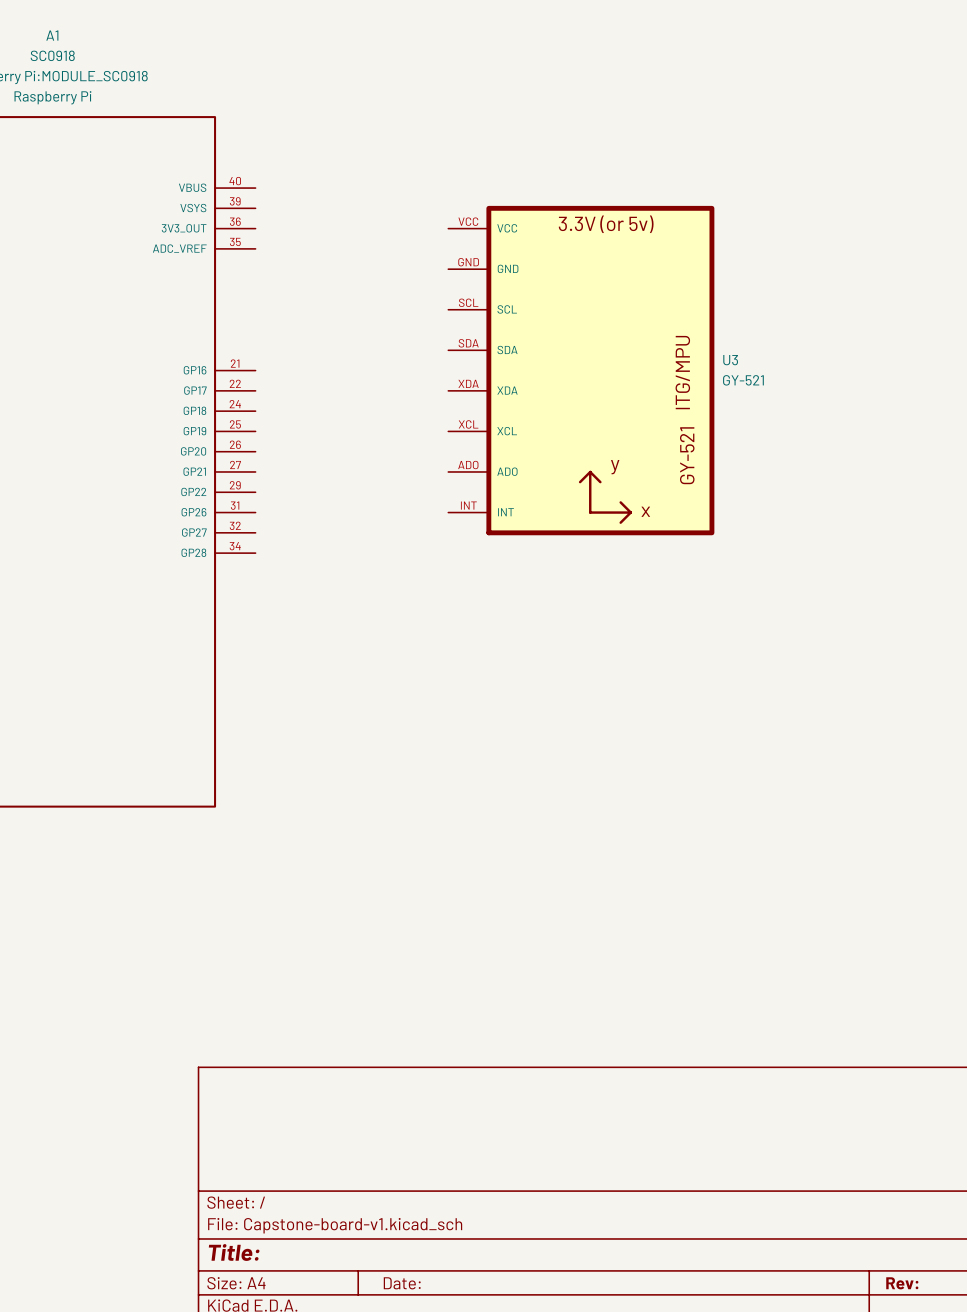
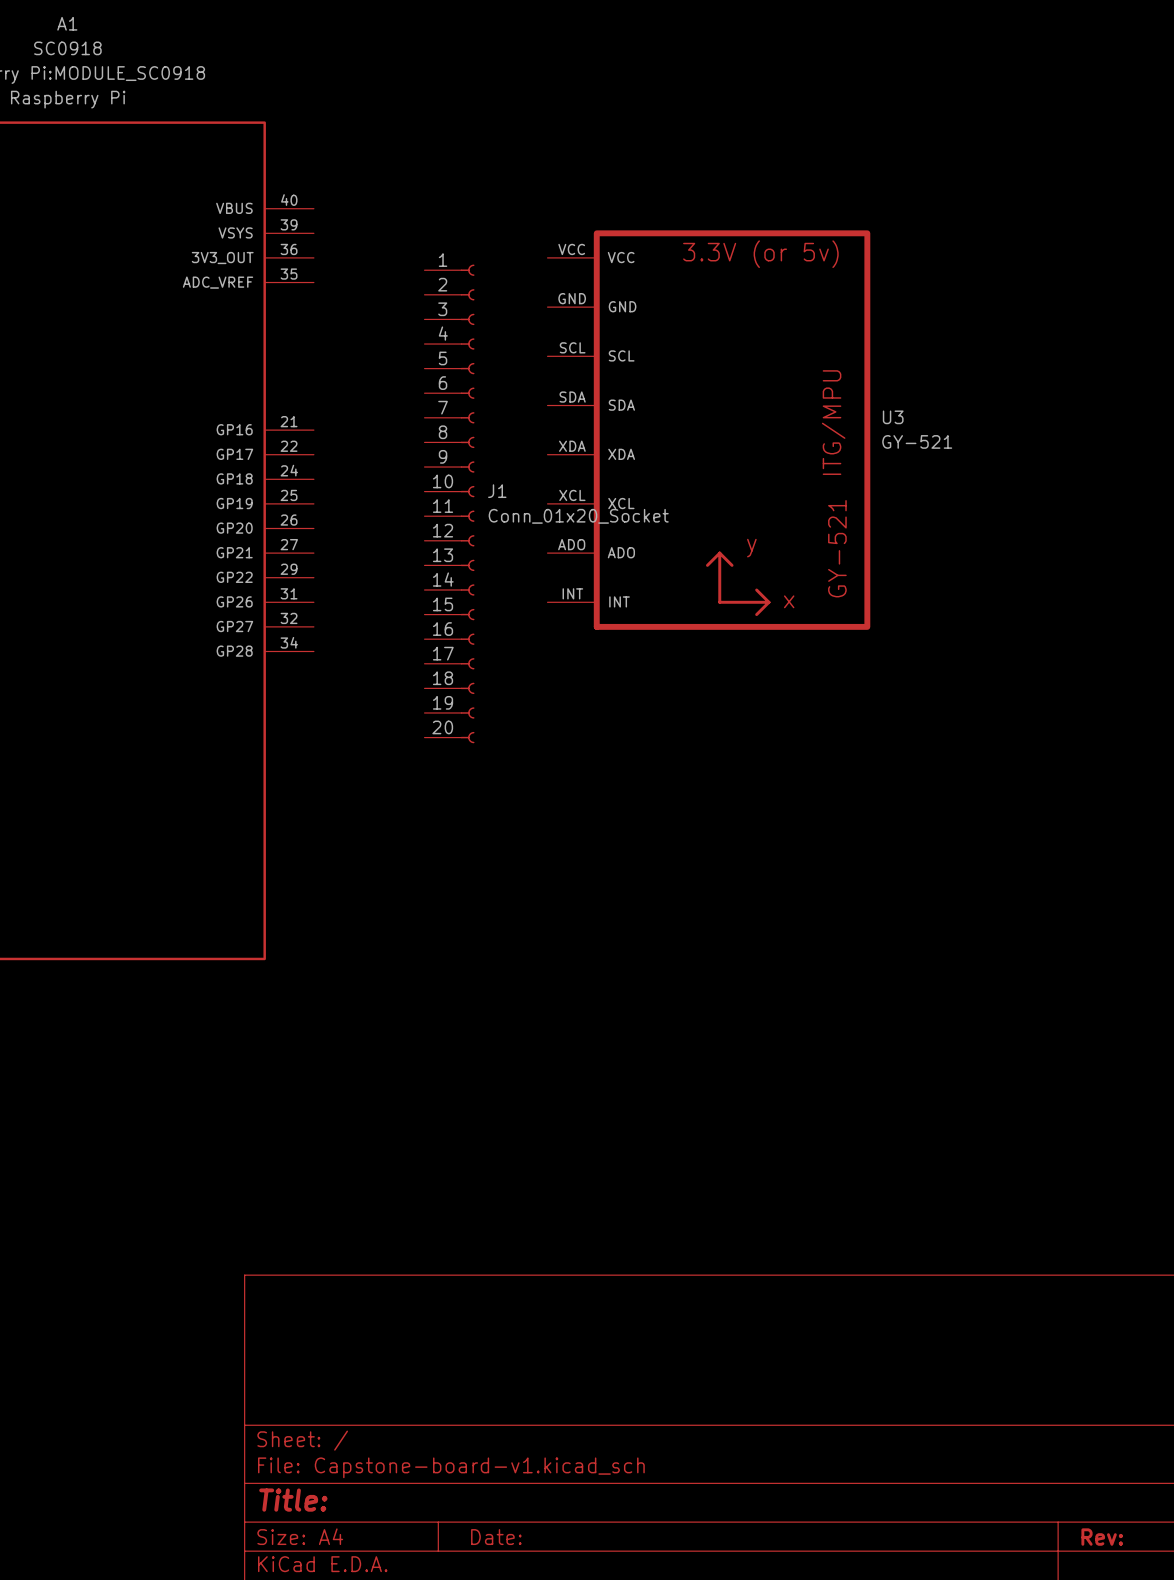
J1: none -> Conn_01x20_Socket (449, 503)

